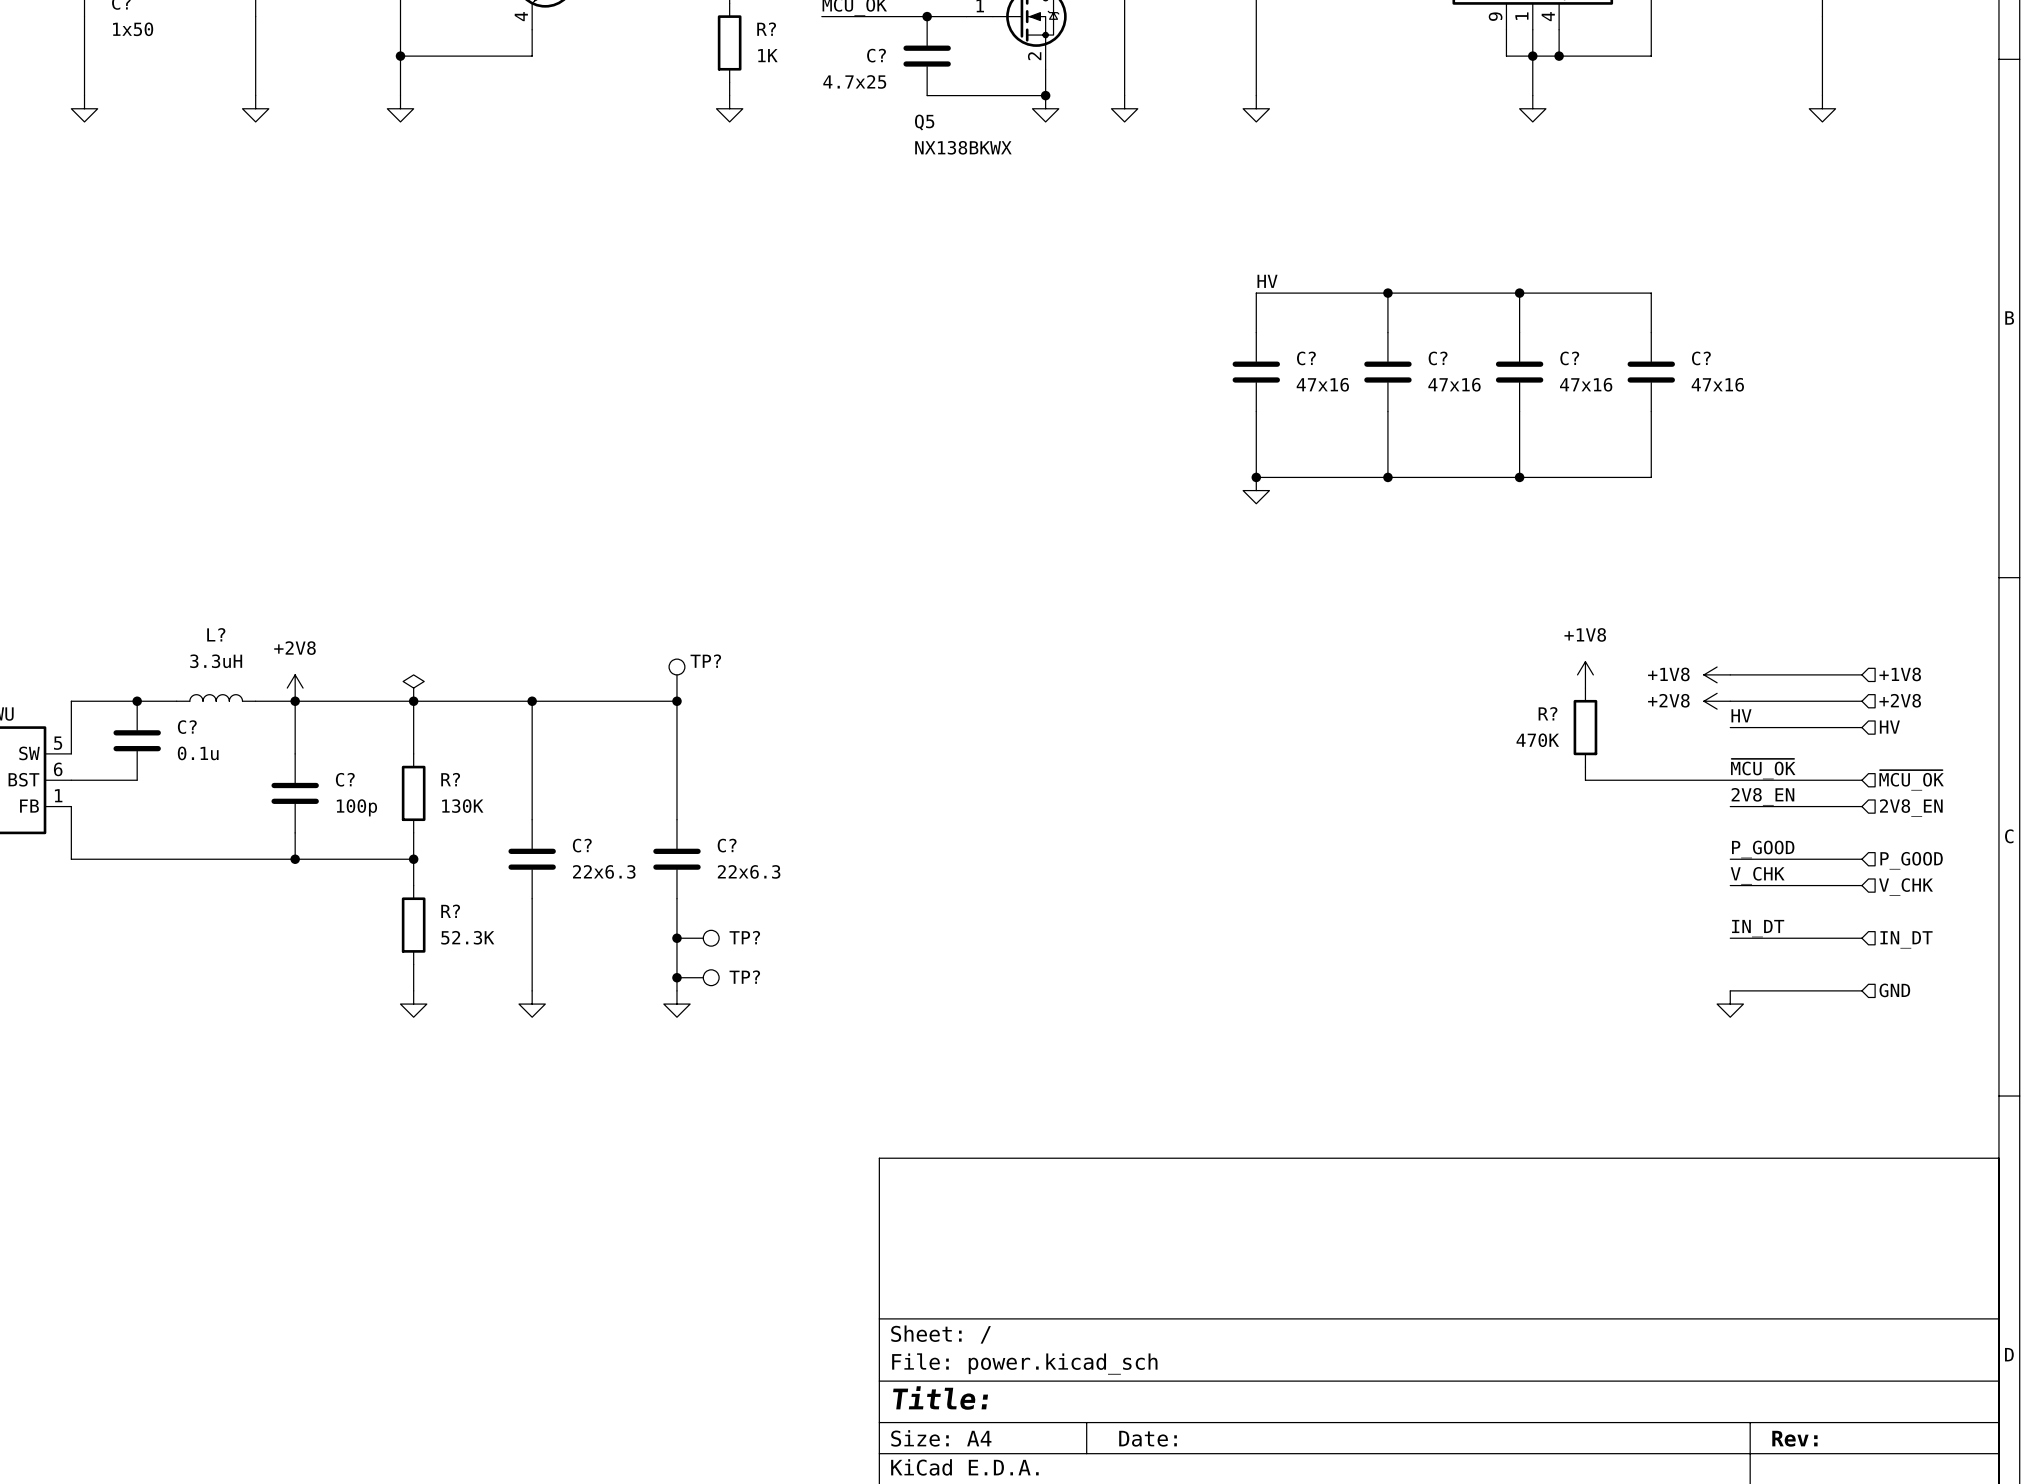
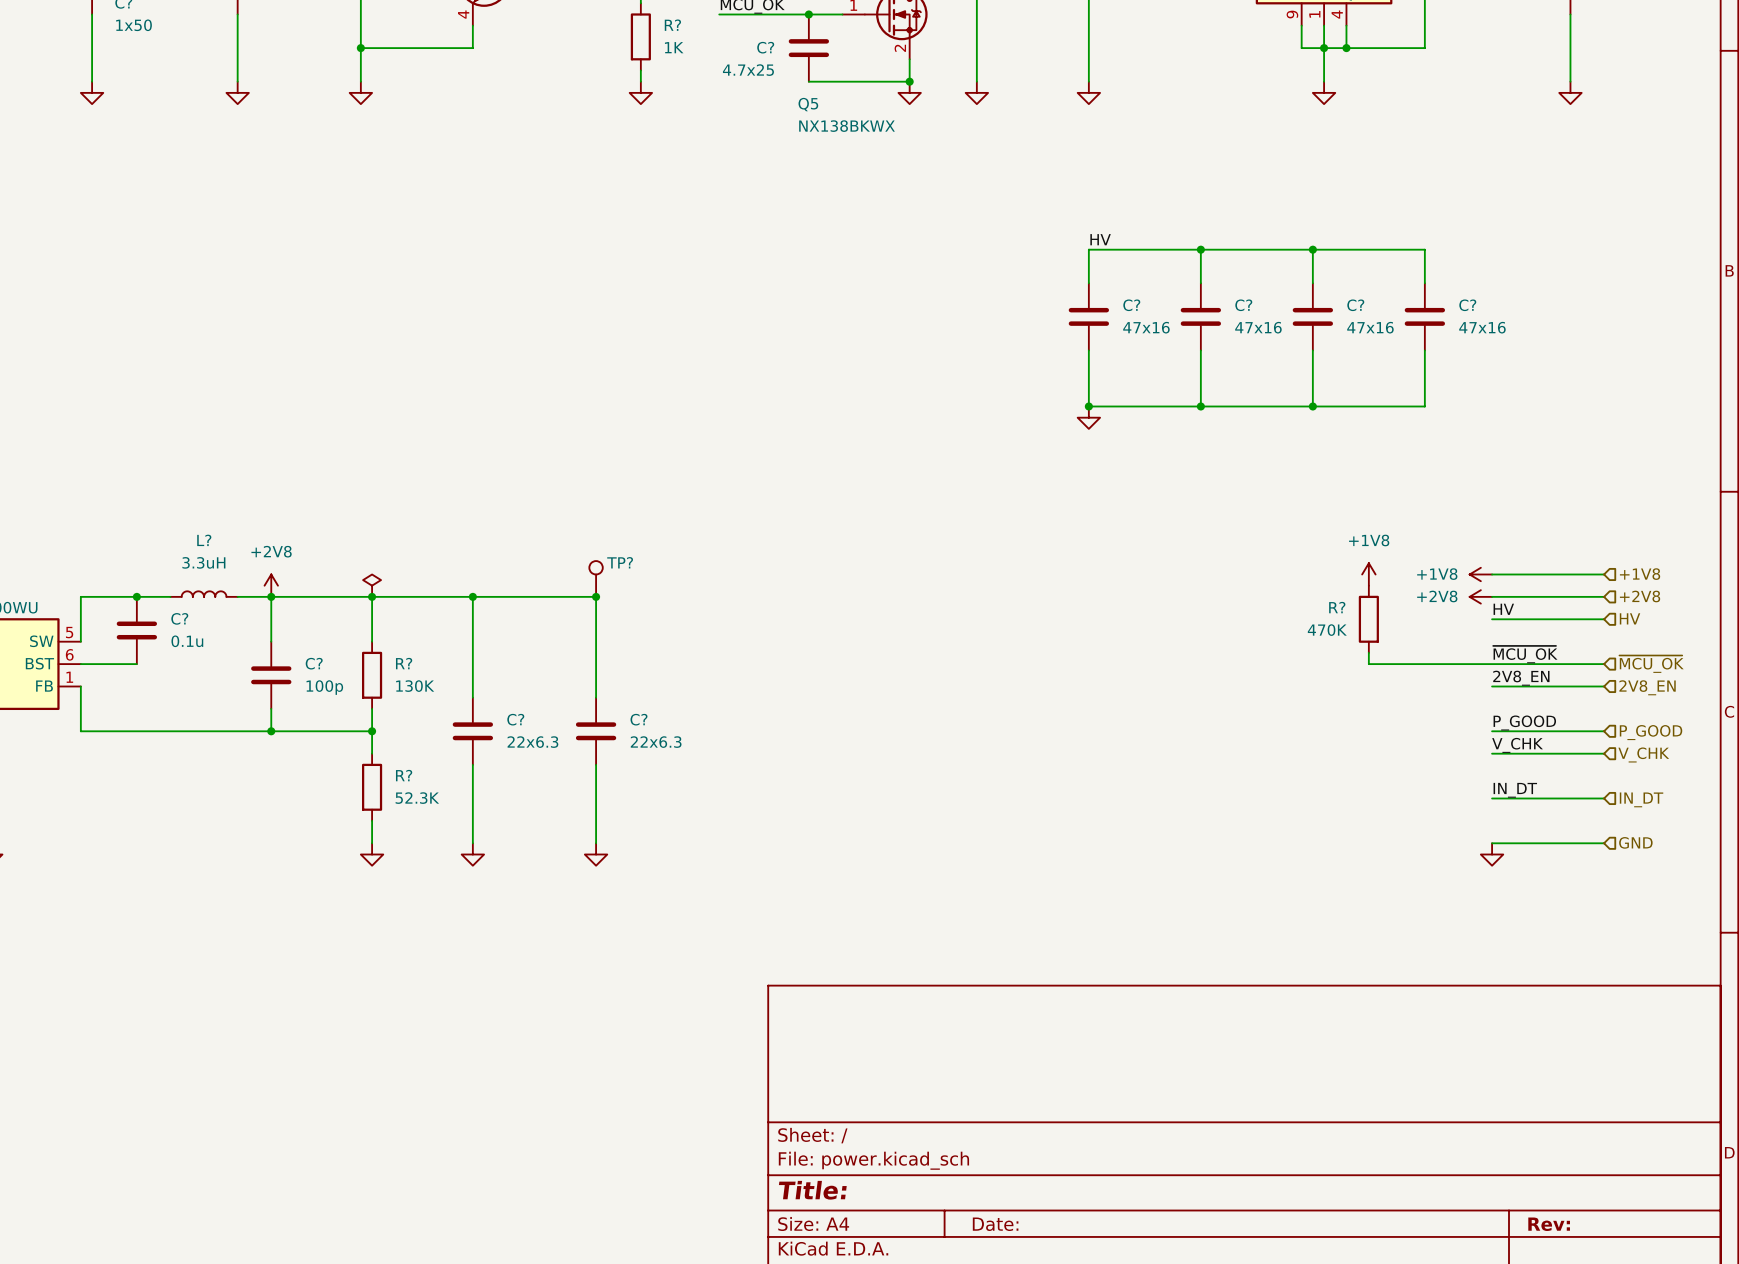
junction: (676, 938) -> none
TP?: (698, 938) -> none
junction: (676, 977) -> none
TP?: (698, 977) -> none

